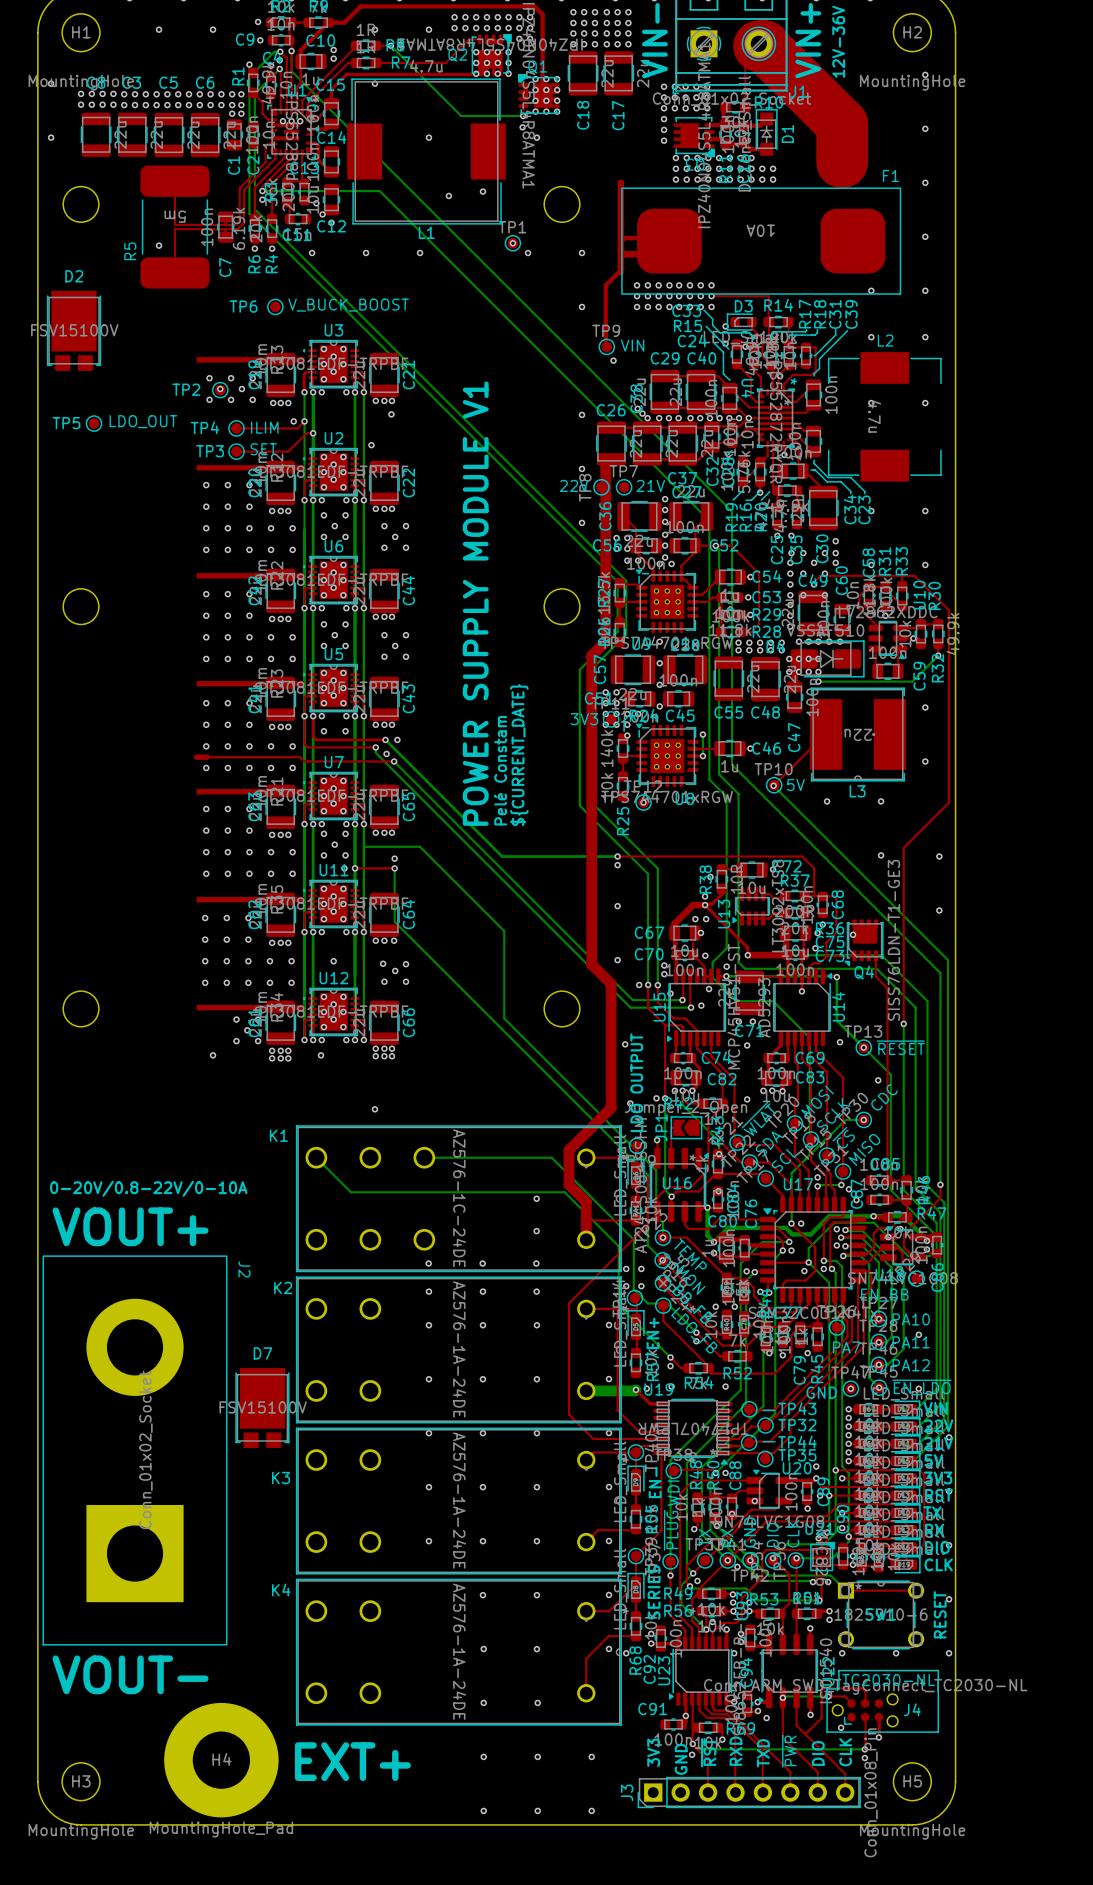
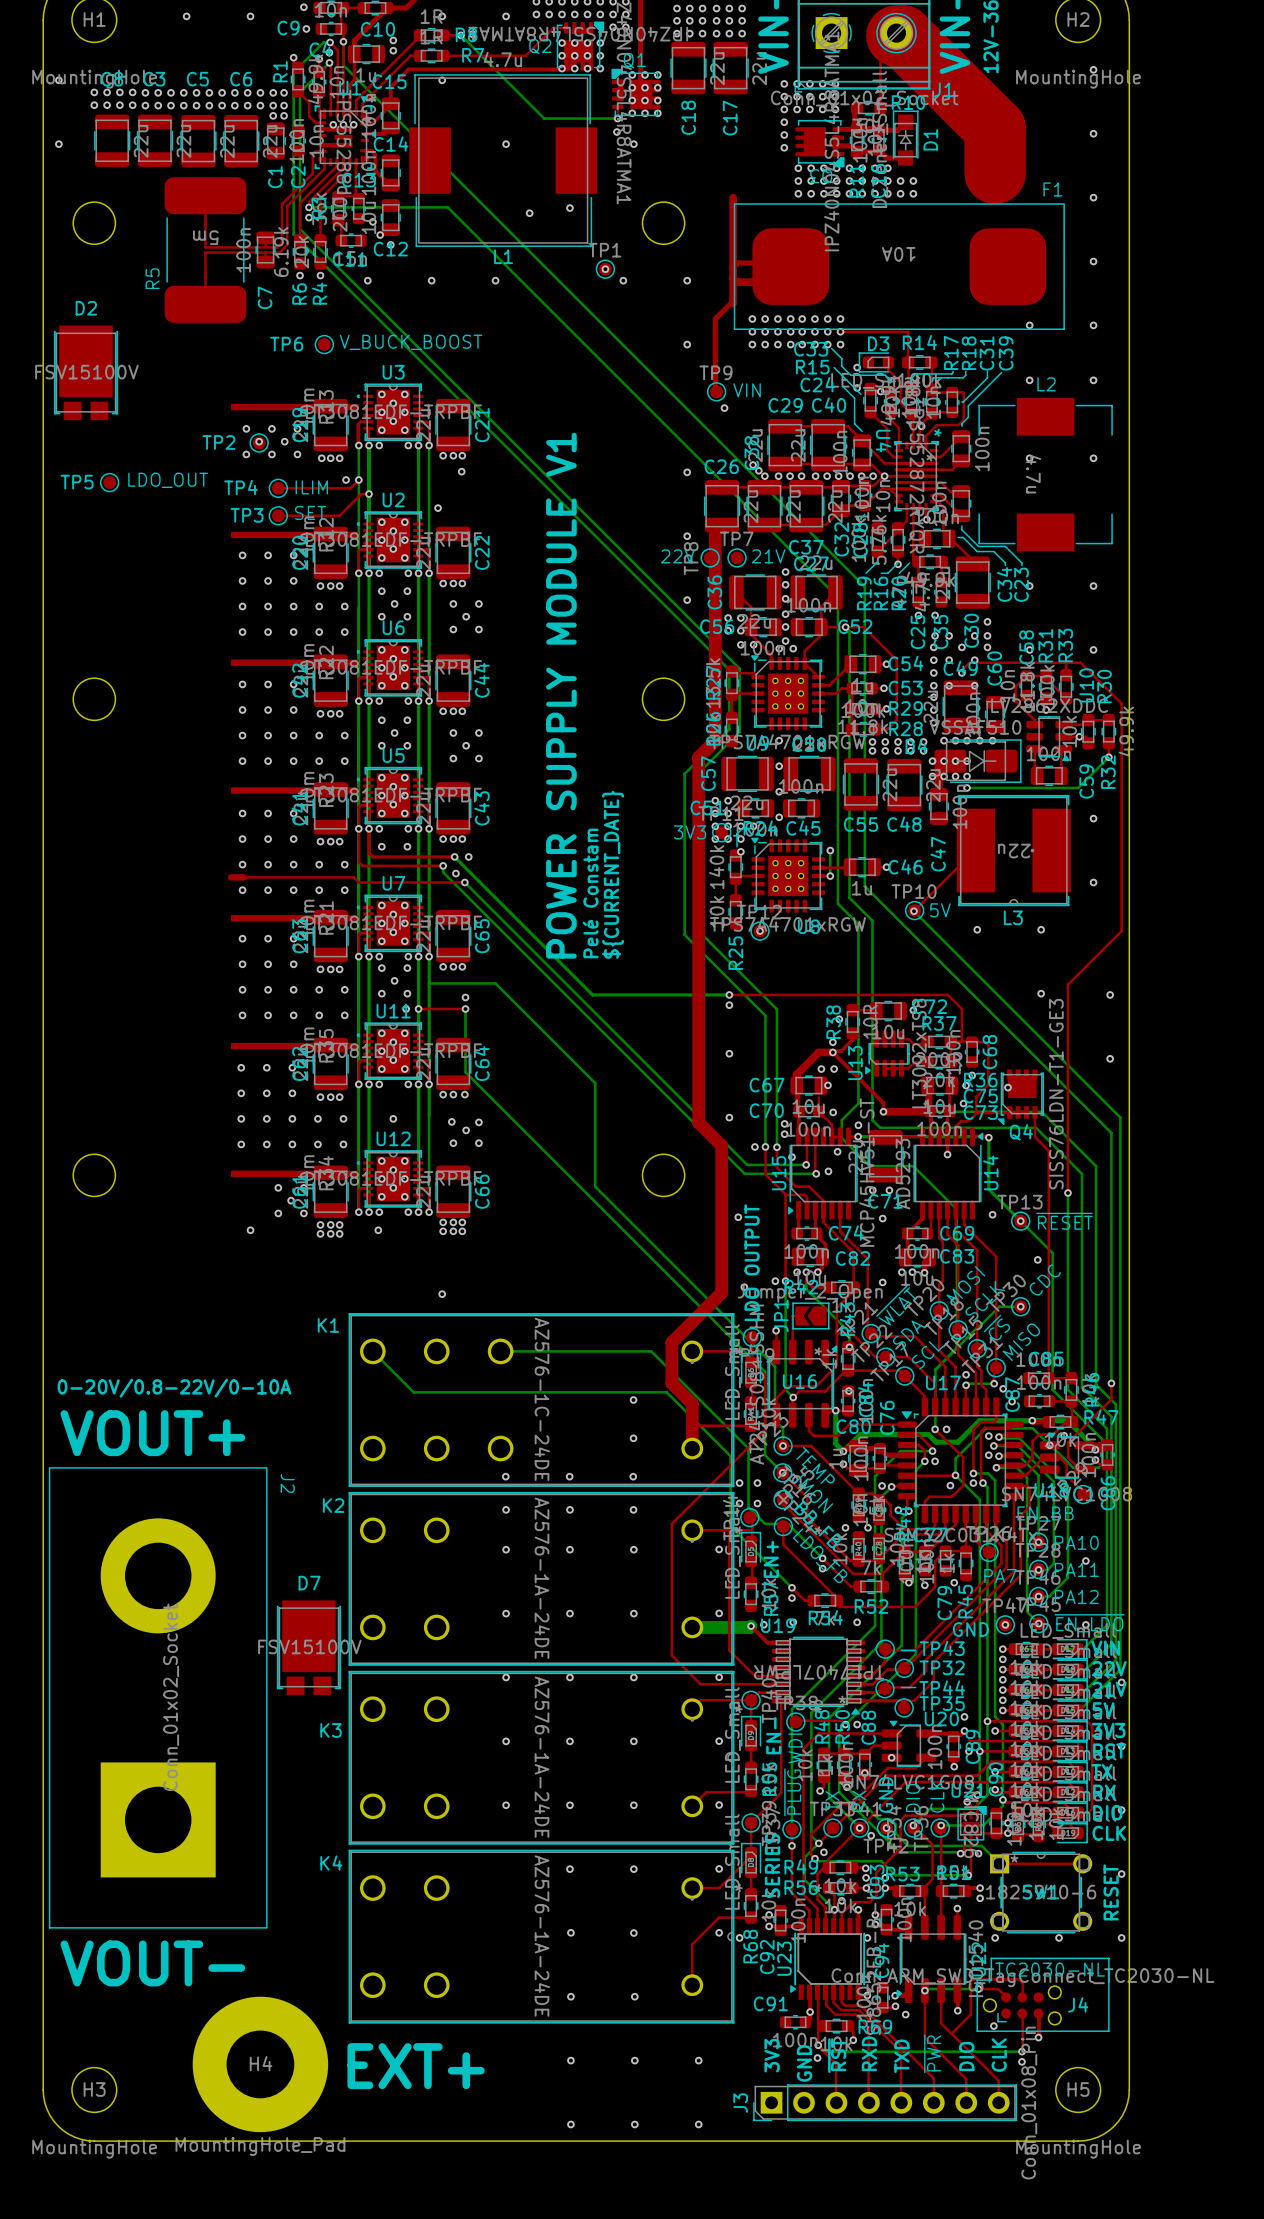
via: (159, 245) -> none

